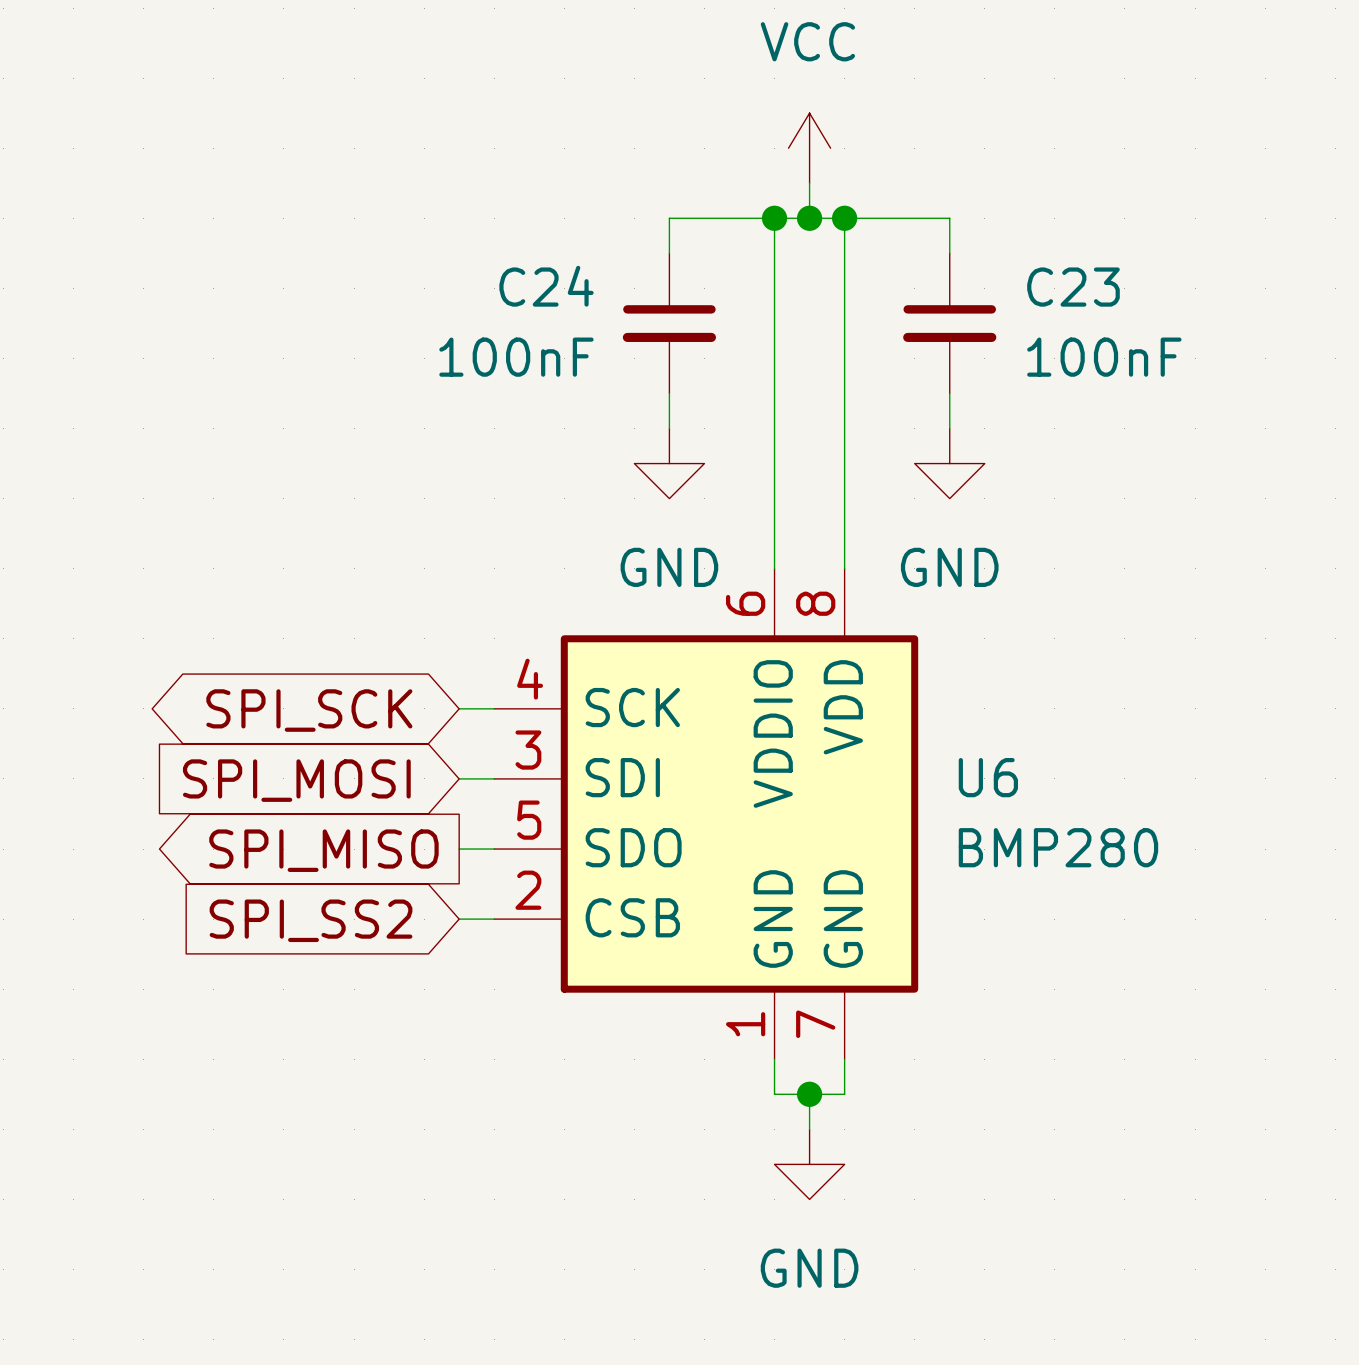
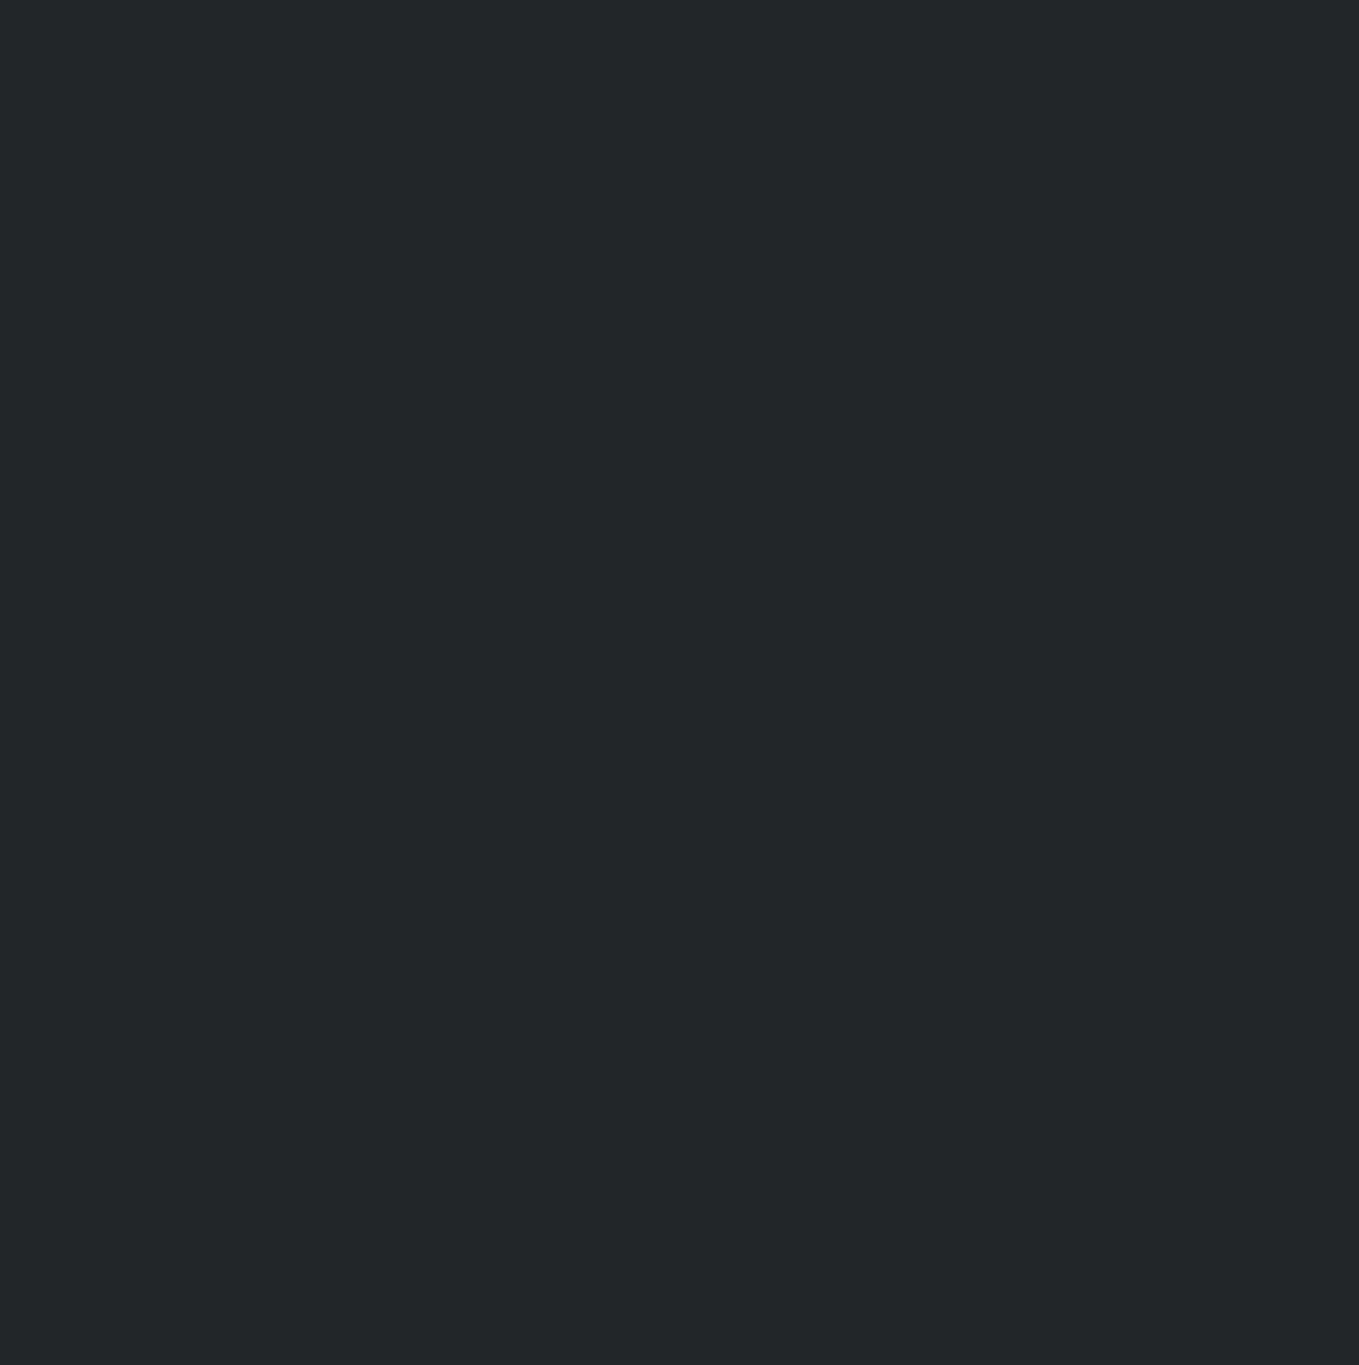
power symbol: VCC (809, 148) -> none
wire: (809, 183) (809, 218) -> none
wire: (774, 218) (774, 568) -> none
junction: (774, 218) -> none
junction: (809, 218) -> none
wire: (844, 218) (844, 568) -> none
junction: (844, 218) -> none
wire: (669, 253) (669, 218) (949, 218) (949, 253) -> none
C24: 100nF (669, 323) -> none
C23: 100nF (949, 323) -> none
wire: (669, 393) (669, 428) -> none
wire: (949, 393) (949, 428) -> none
power symbol: GND (669, 463) -> none
power symbol: GND (949, 463) -> none
wire: (459, 708) (494, 708) -> none
global label: SPI_SCK (309, 710) -> none
wire: (459, 778) (494, 778) -> none
global label: SPI_MOSI (296, 780) -> none
U6: BMP280 (706, 813) -> none
wire: (459, 849) (494, 849) -> none
global label: SPI_MISO (323, 850) -> none
wire: (459, 919) (494, 919) -> none
global label: SPI_SS2 (311, 920) -> none
wire: (774, 1059) (774, 1094) (844, 1094) (844, 1059) -> none
wire: (809, 1094) (809, 1129) -> none
junction: (809, 1094) -> none
power symbol: GND (809, 1164) -> none

